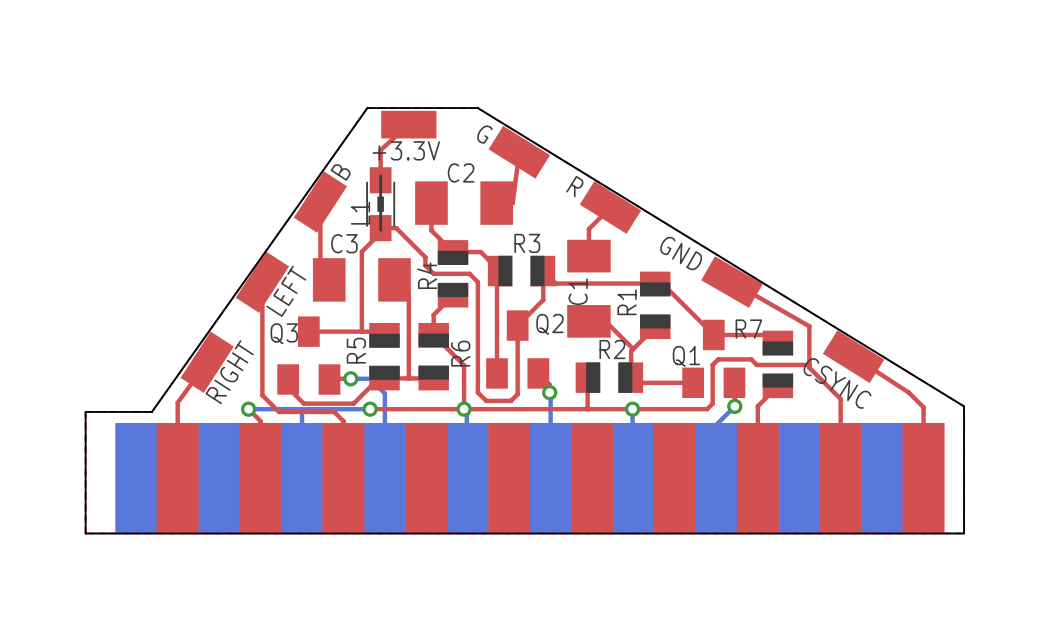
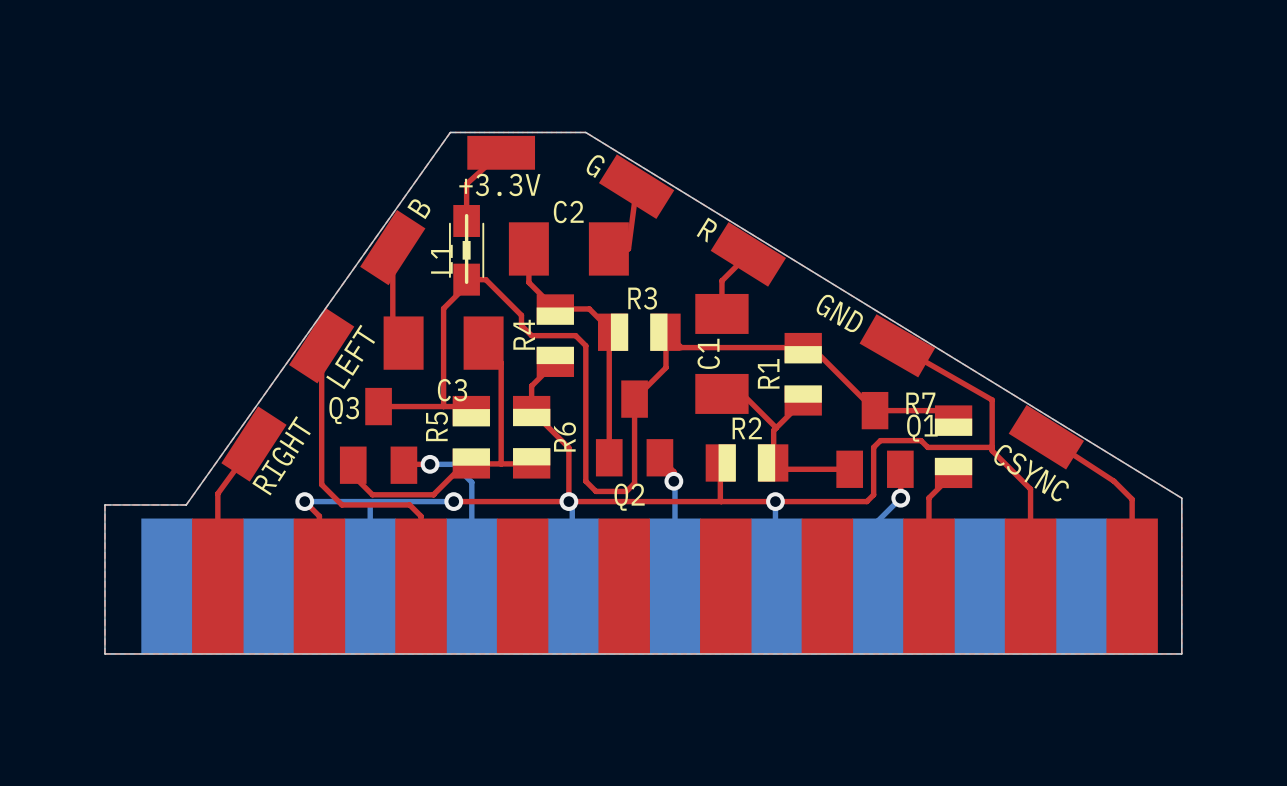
C3 name position: C3 (344, 243) -> C3 (452, 390)
Q2 name position: Q2 (549, 324) -> Q2 (629, 497)
Q1 name position: Q1 (686, 356) -> Q1 (922, 428)

